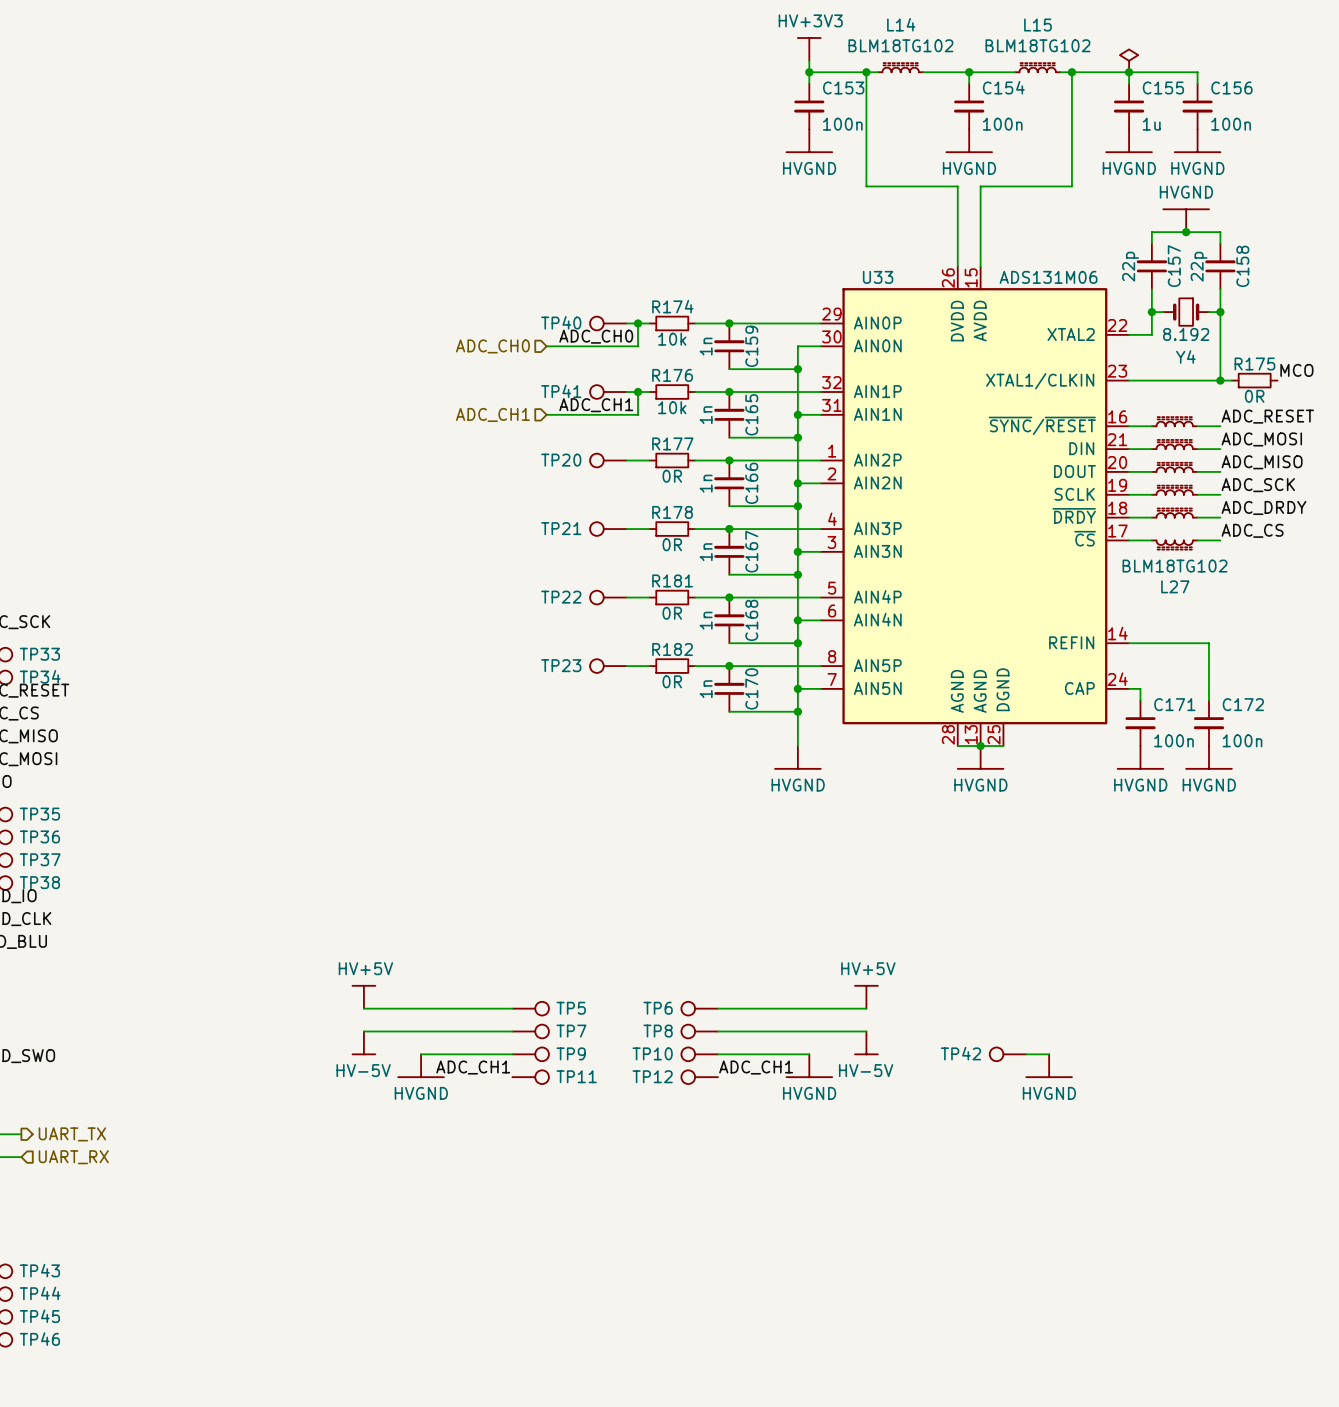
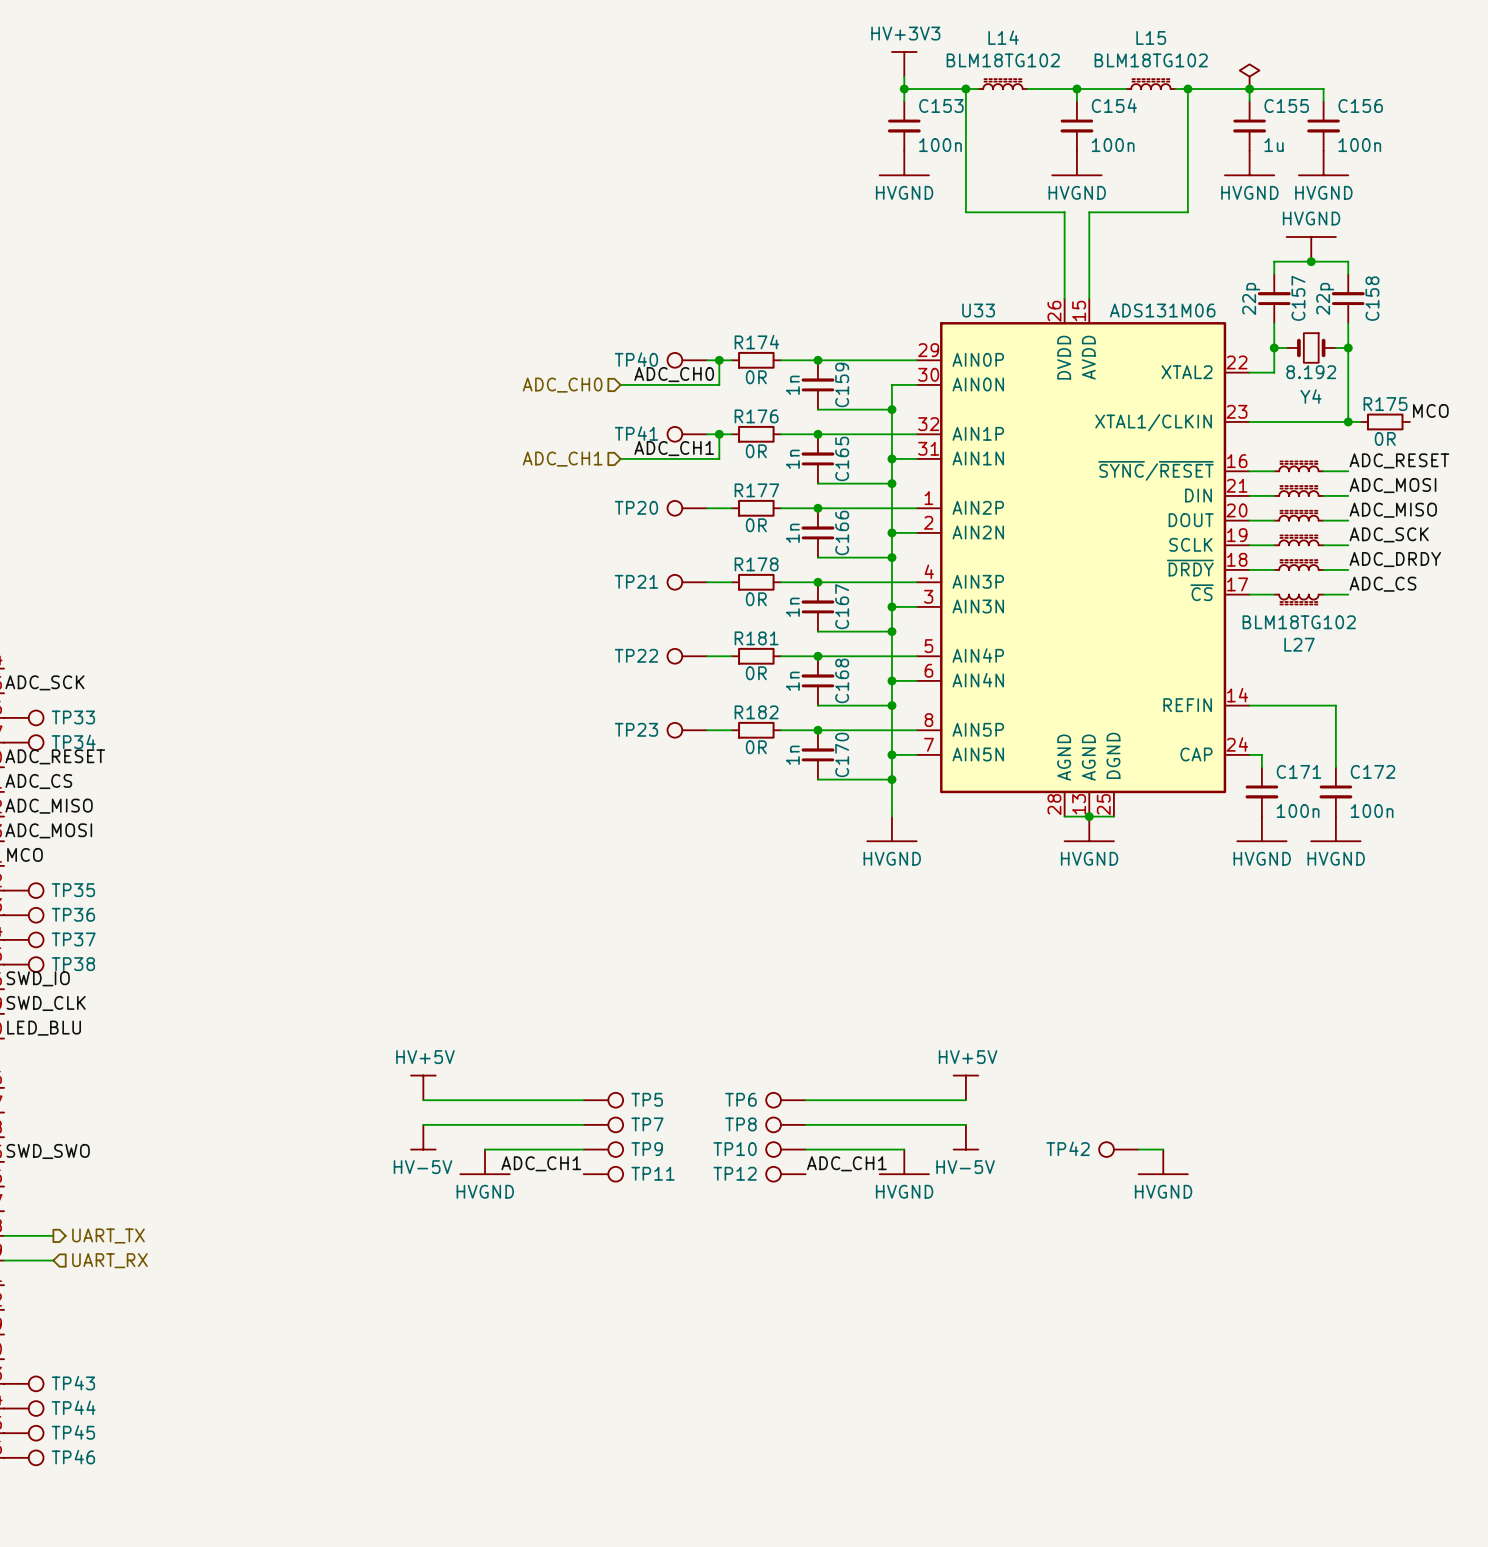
R174 value: 10k (672, 339) -> 0R (756, 377)
R176 value: 10k (672, 407) -> 0R (756, 451)

